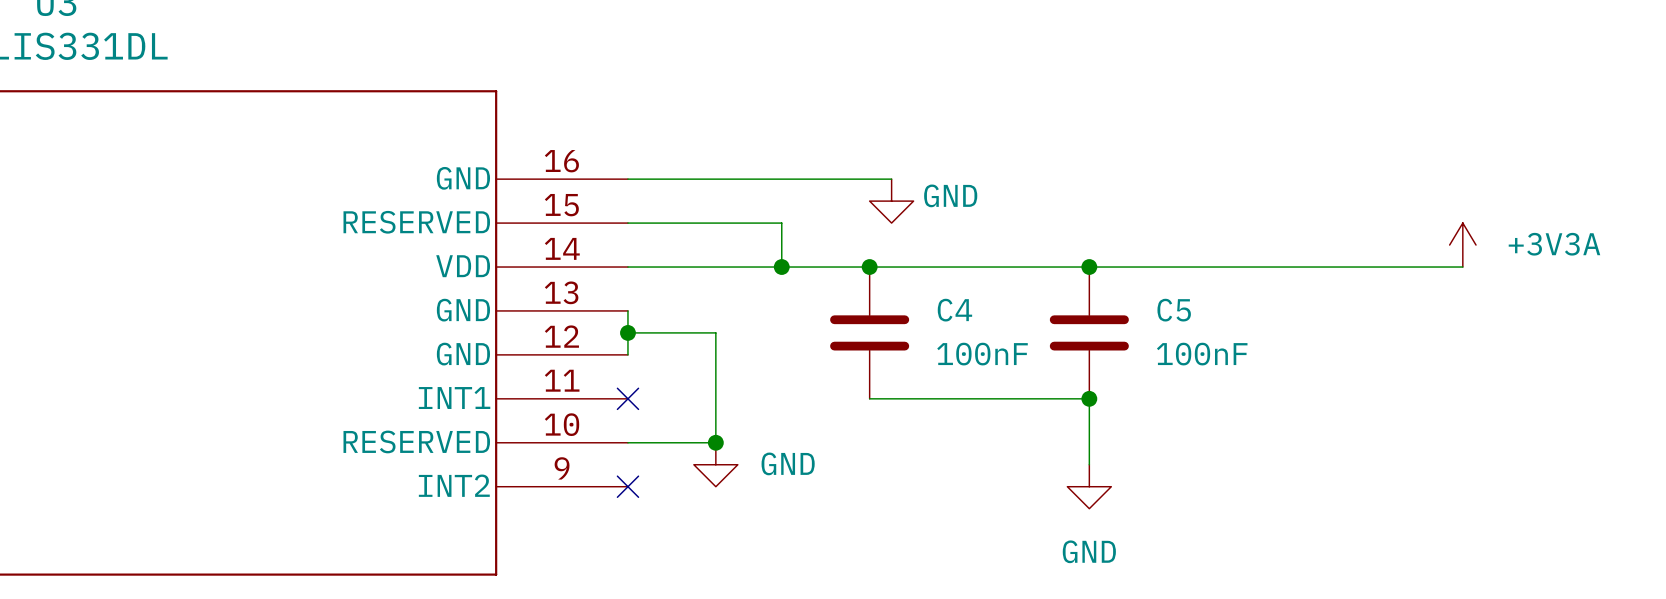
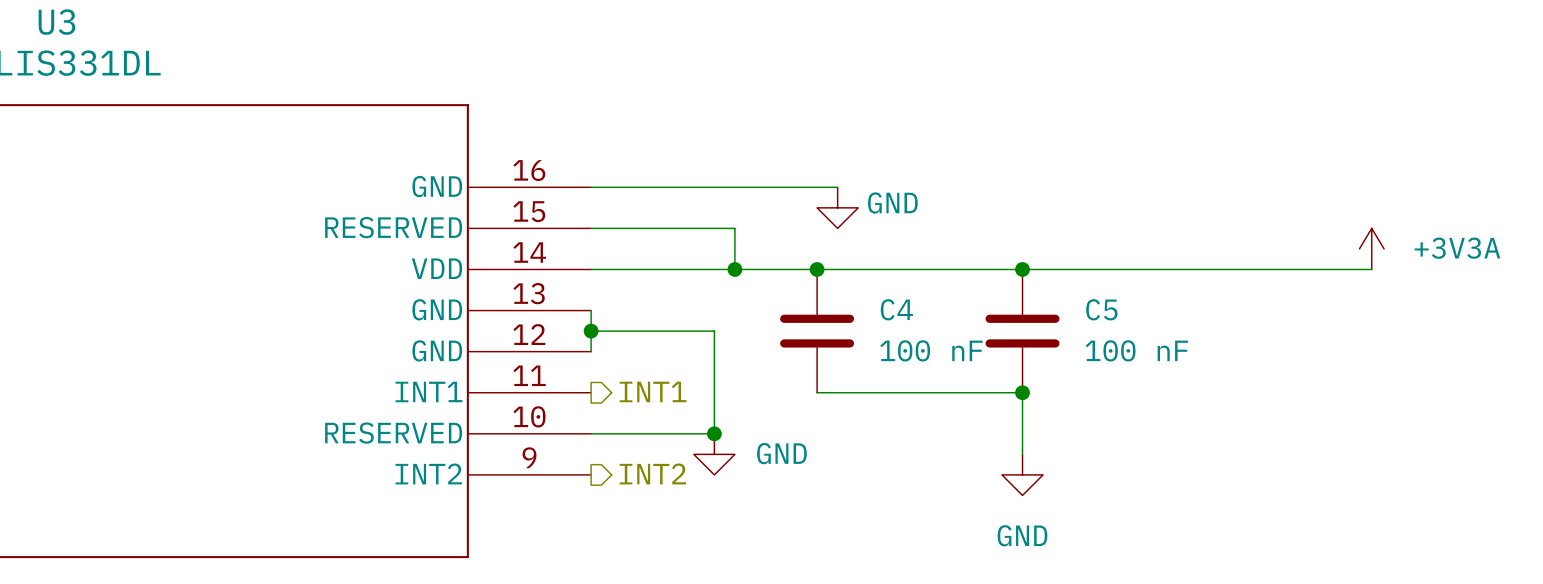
wire: (715, 332) (715, 442) -> (673, 331) (714, 331) (714, 433) (673, 433)
C4 value: 100nF (982, 354) -> 100 nF (931, 350)
C5 value: 100nF (1202, 354) -> 100 nF (1136, 350)
no-connect mark: (627, 398) -> none
hierarchical label: none -> INT1 (653, 391)
junction position: (715, 442) -> (714, 433)
power symbol position: GND (715, 464) -> GND (714, 454)
hierarchical label: none -> INT2 (652, 473)
no-connect mark: (627, 486) -> none

